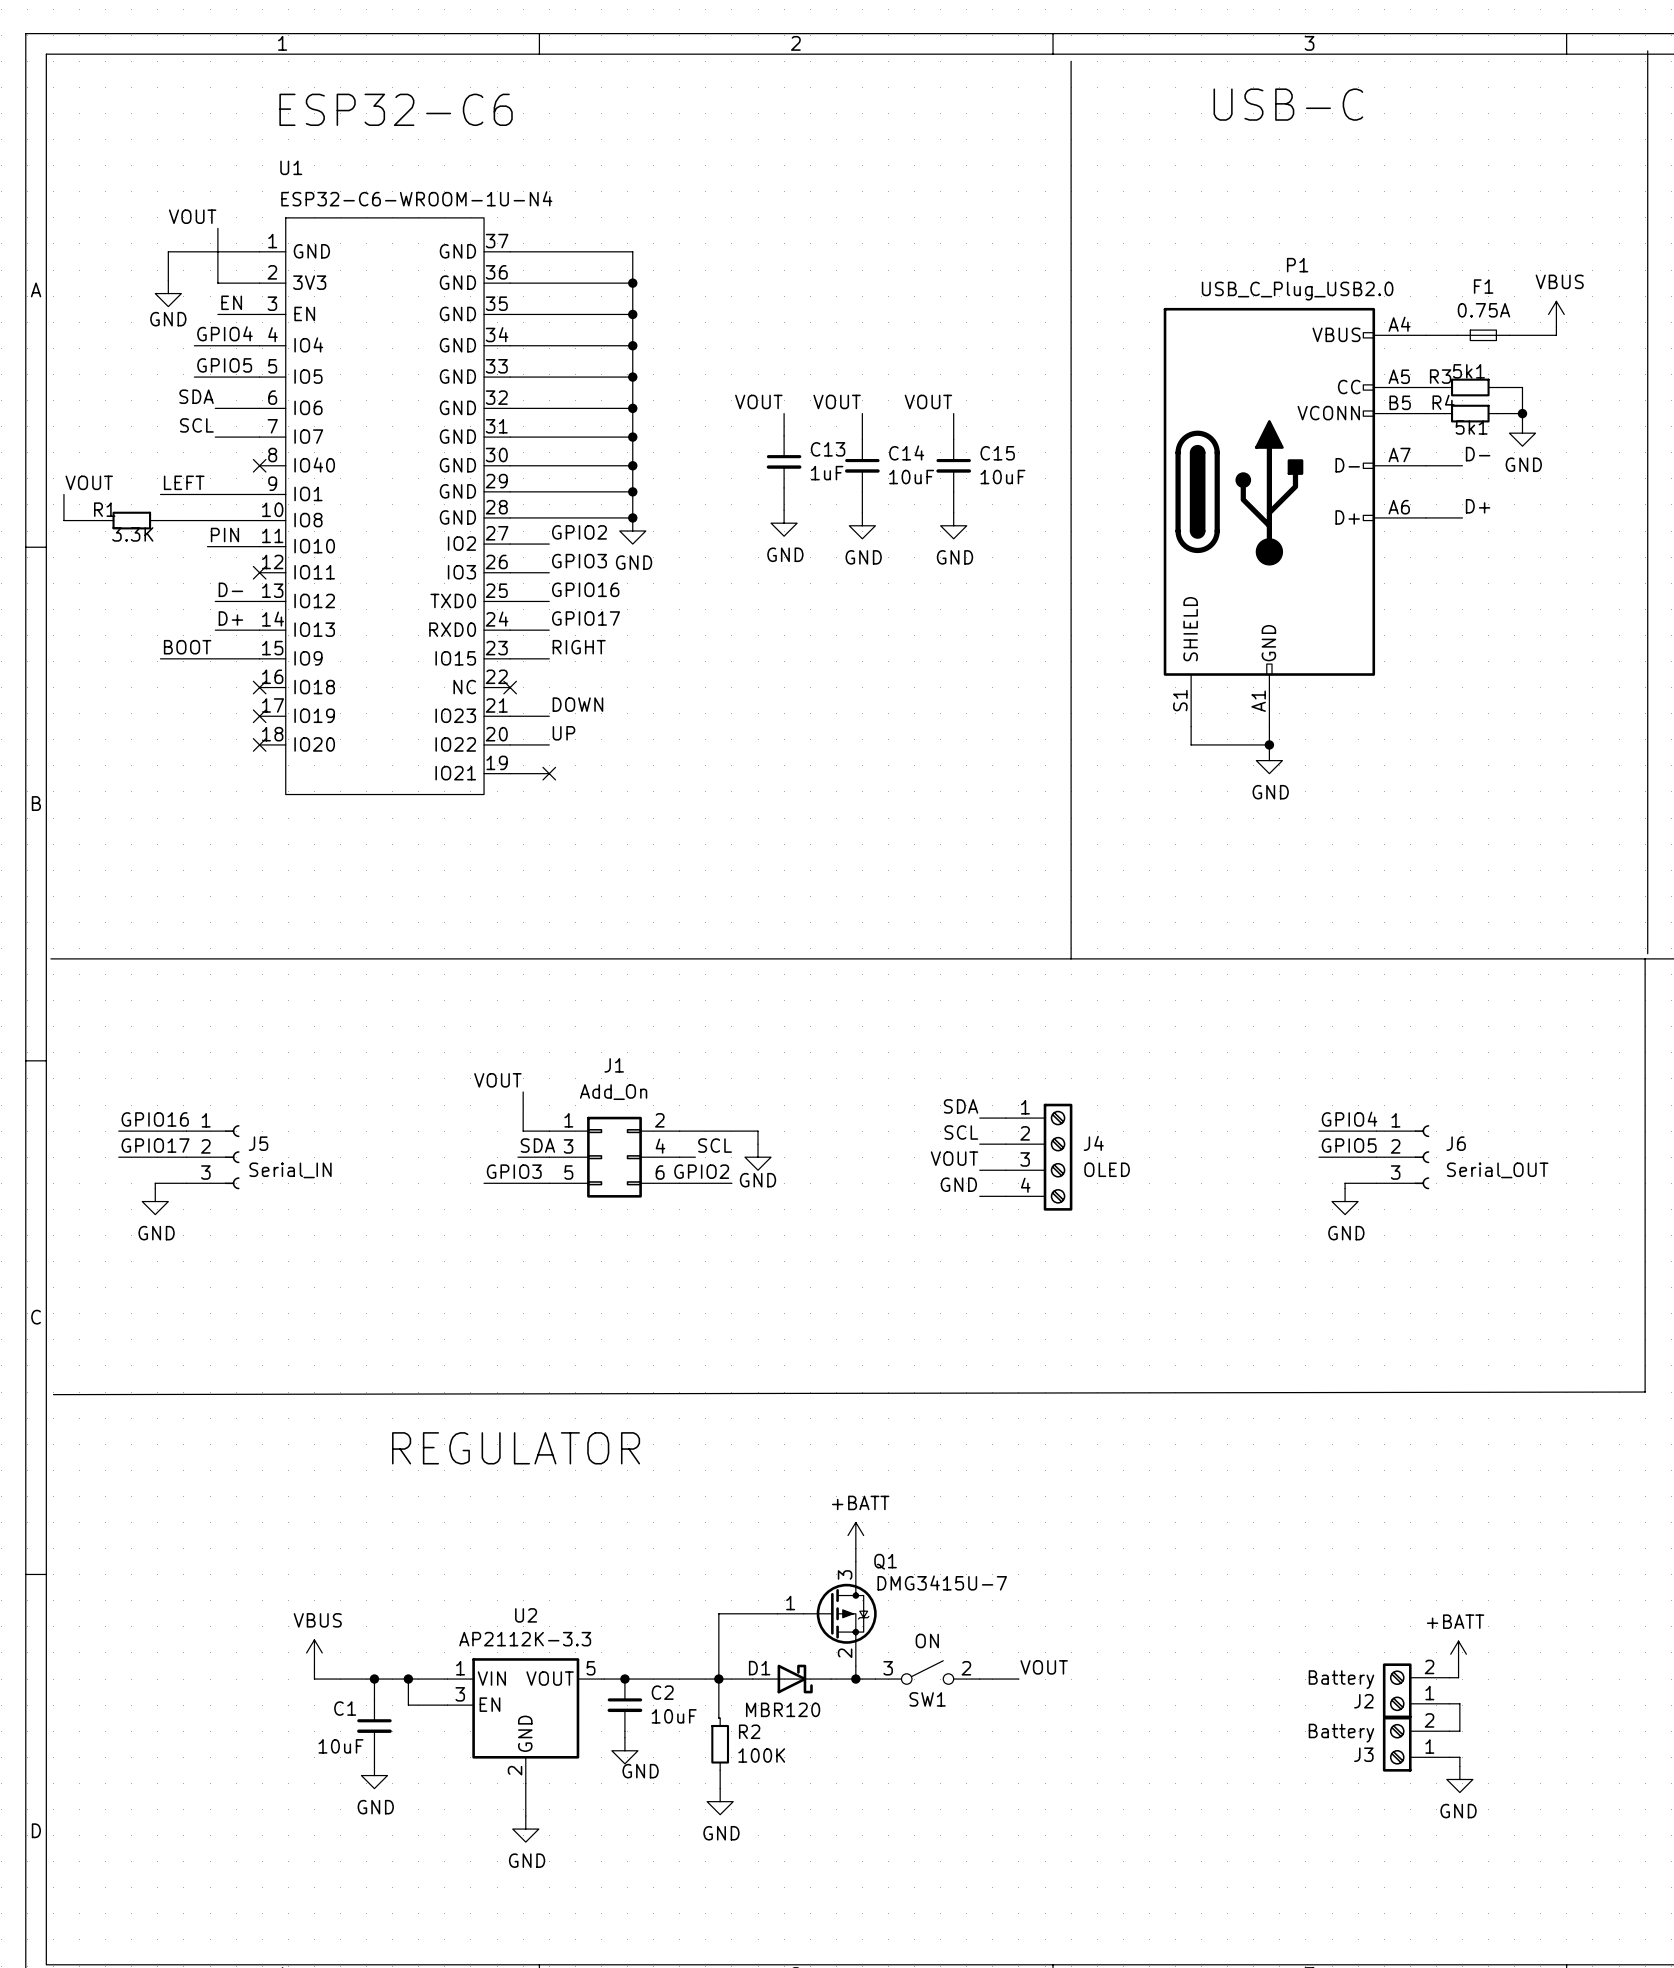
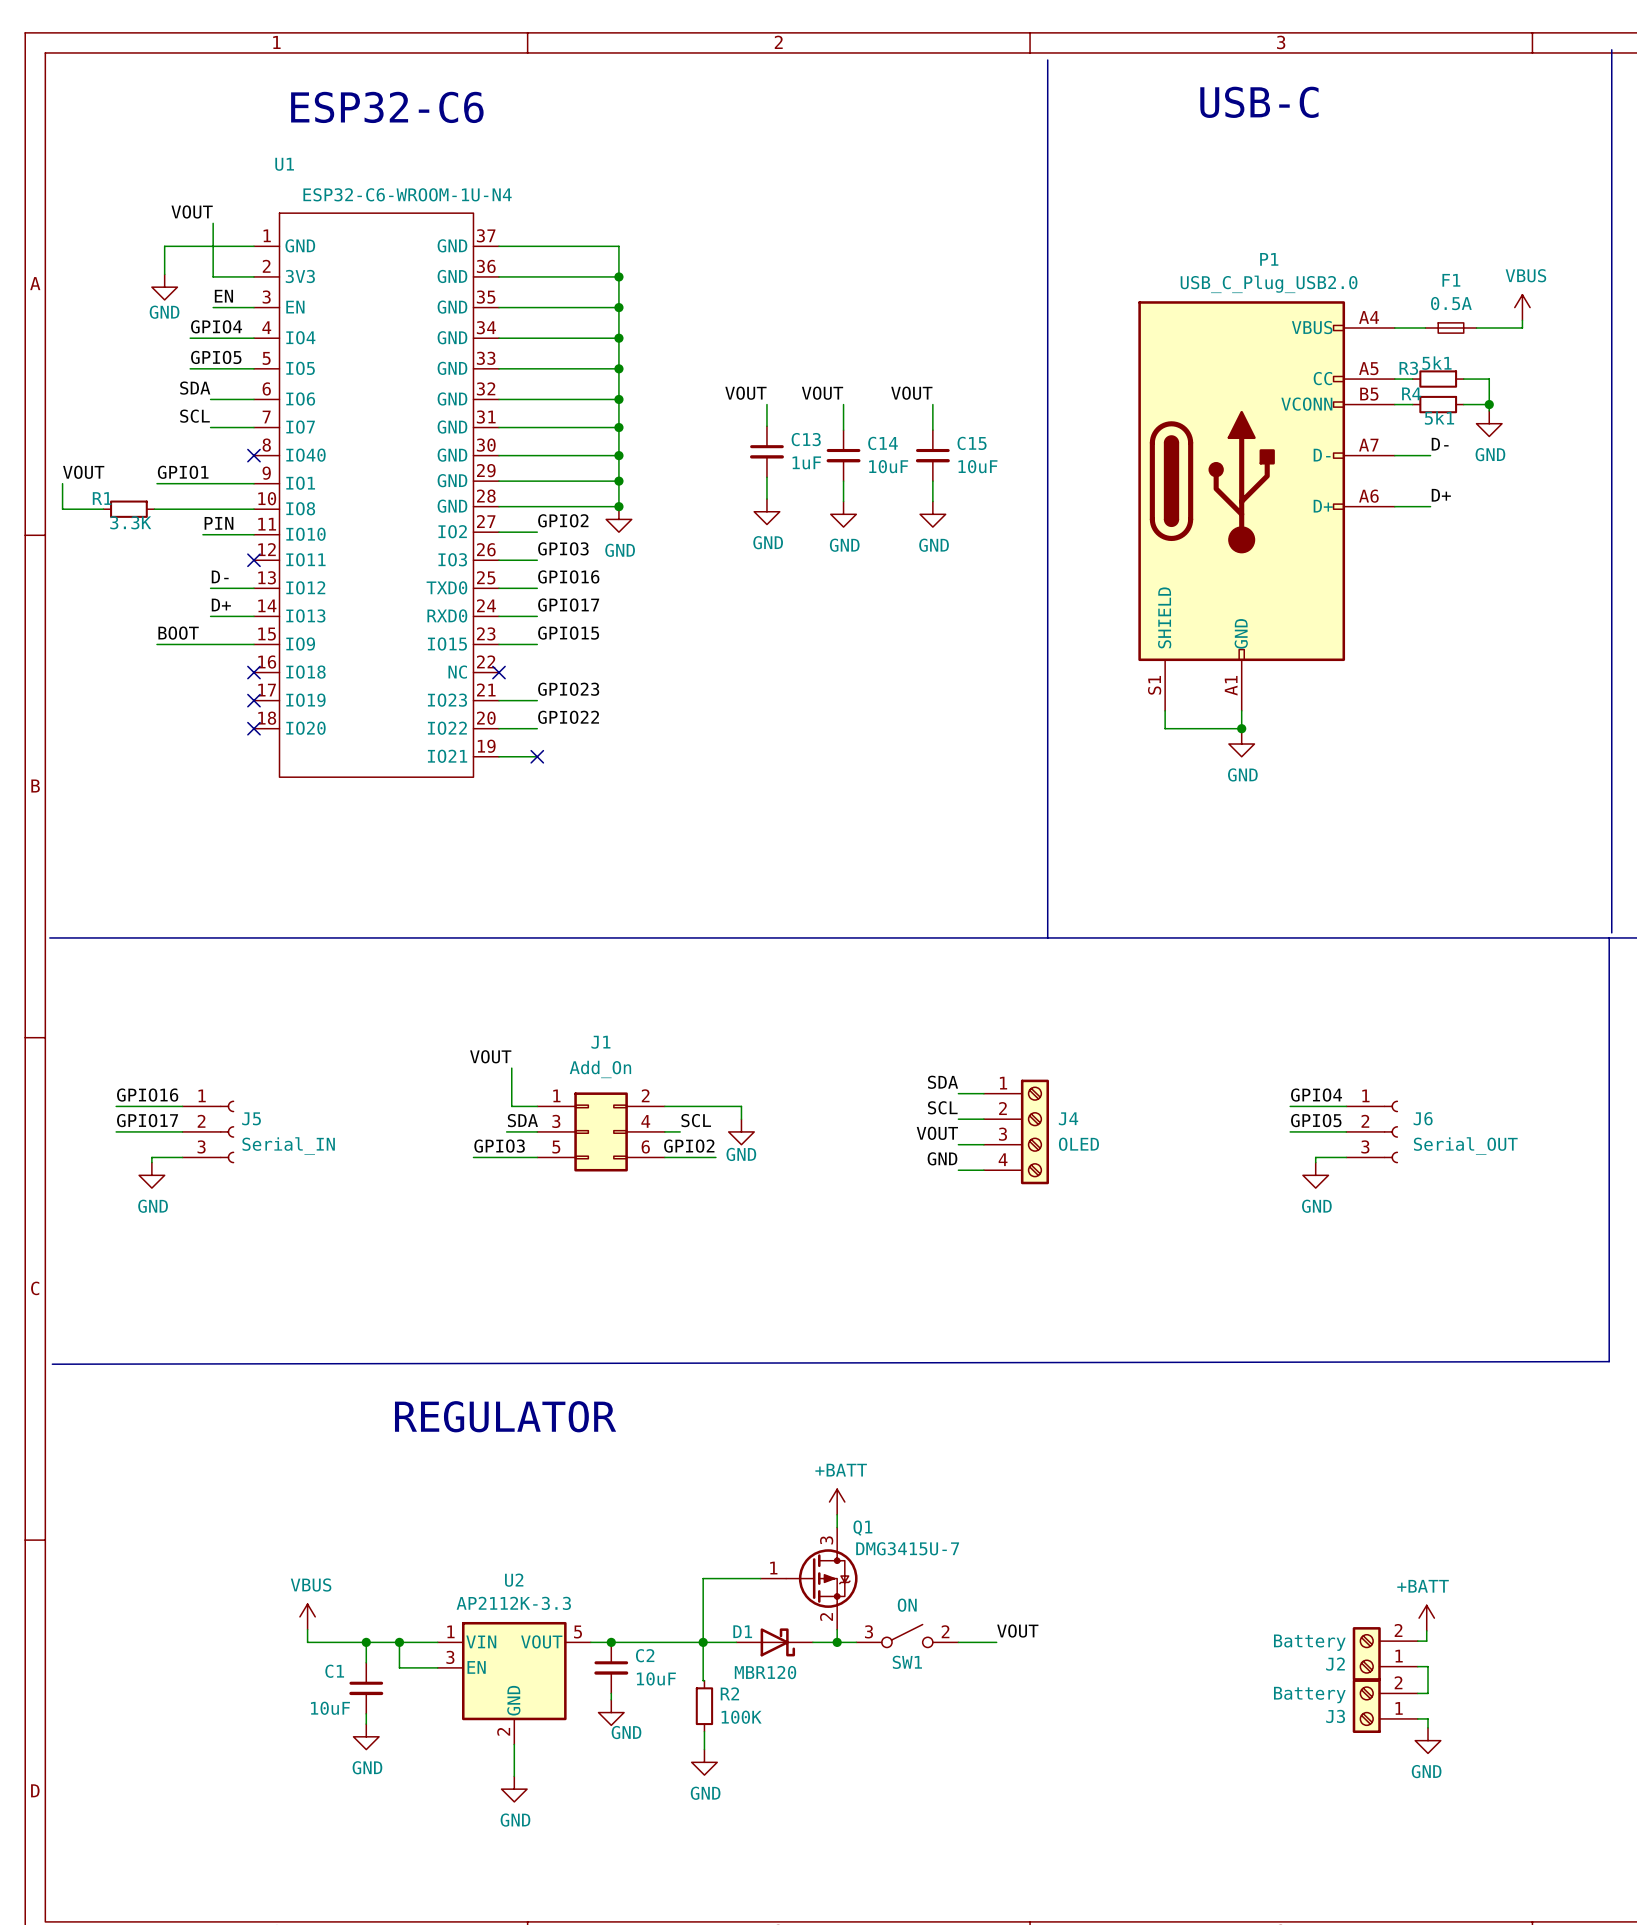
F1 value: 0.75A (1483, 310) -> 0.5A (1451, 303)
label: LEFT (184, 482) -> GPIO1 (183, 472)
label: RIGHT (579, 647) -> GPIO15 (568, 633)
label: DOWN (577, 704) -> GPIO23 (568, 689)
label: UP (563, 733) -> GPIO22 (568, 717)

